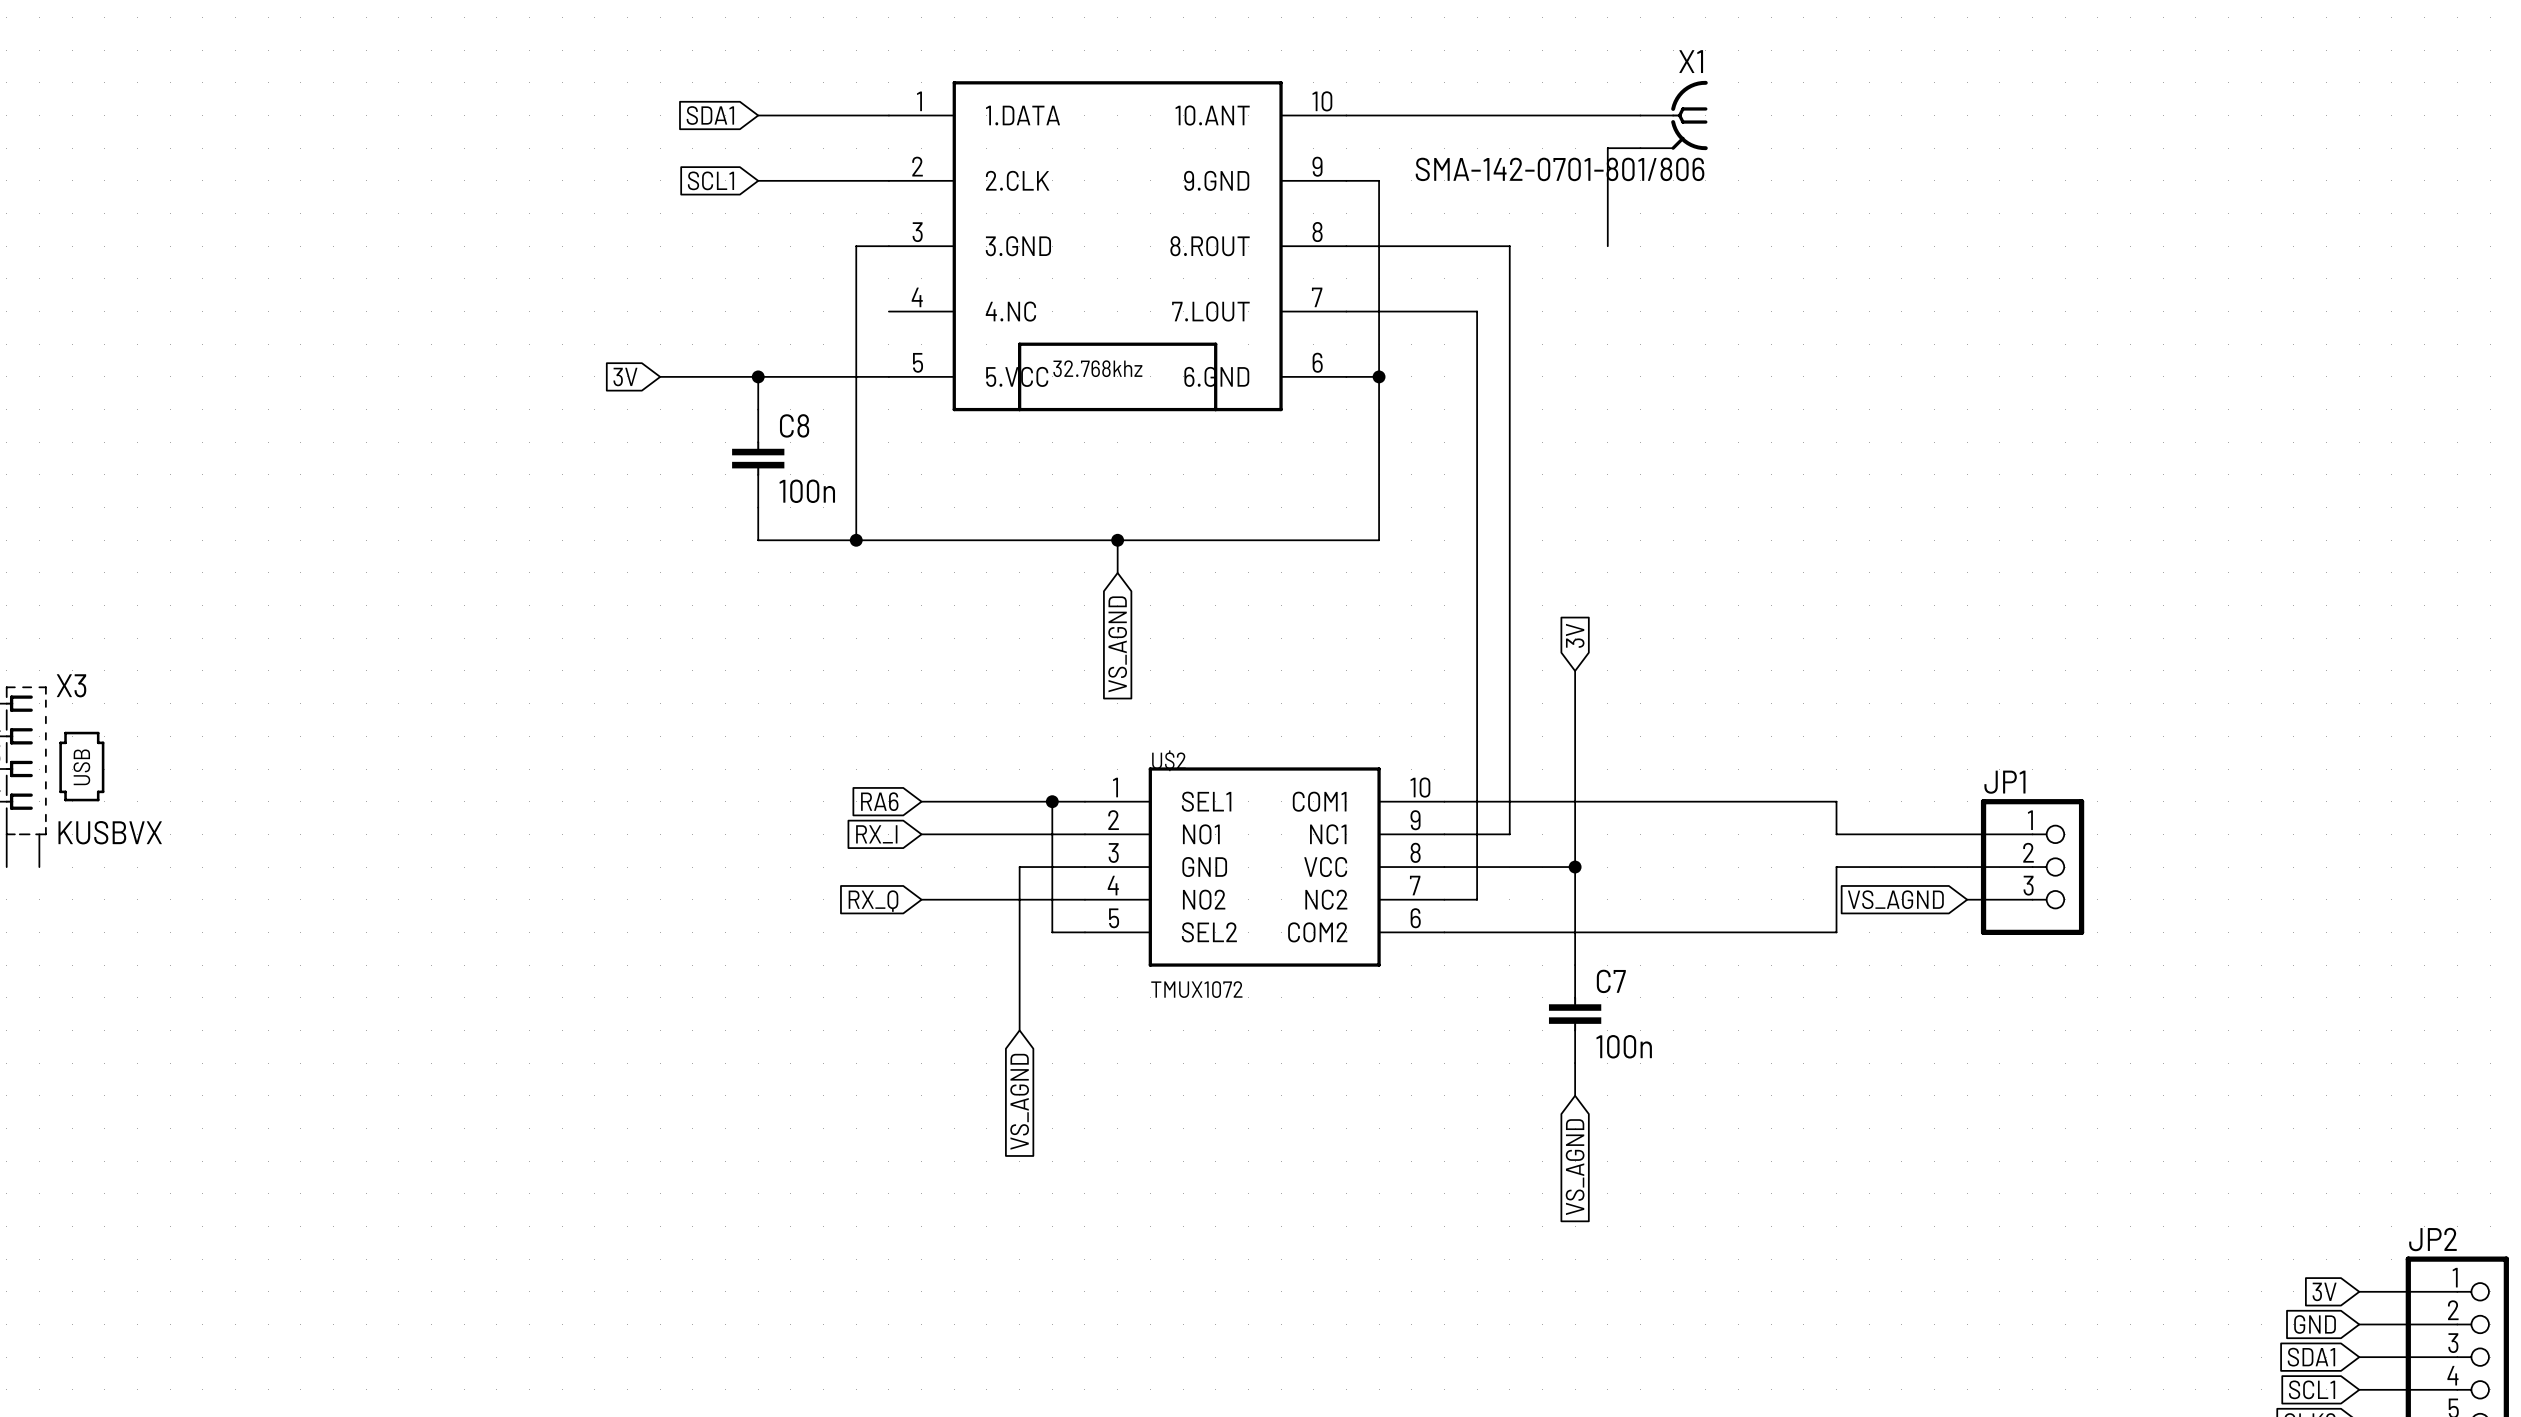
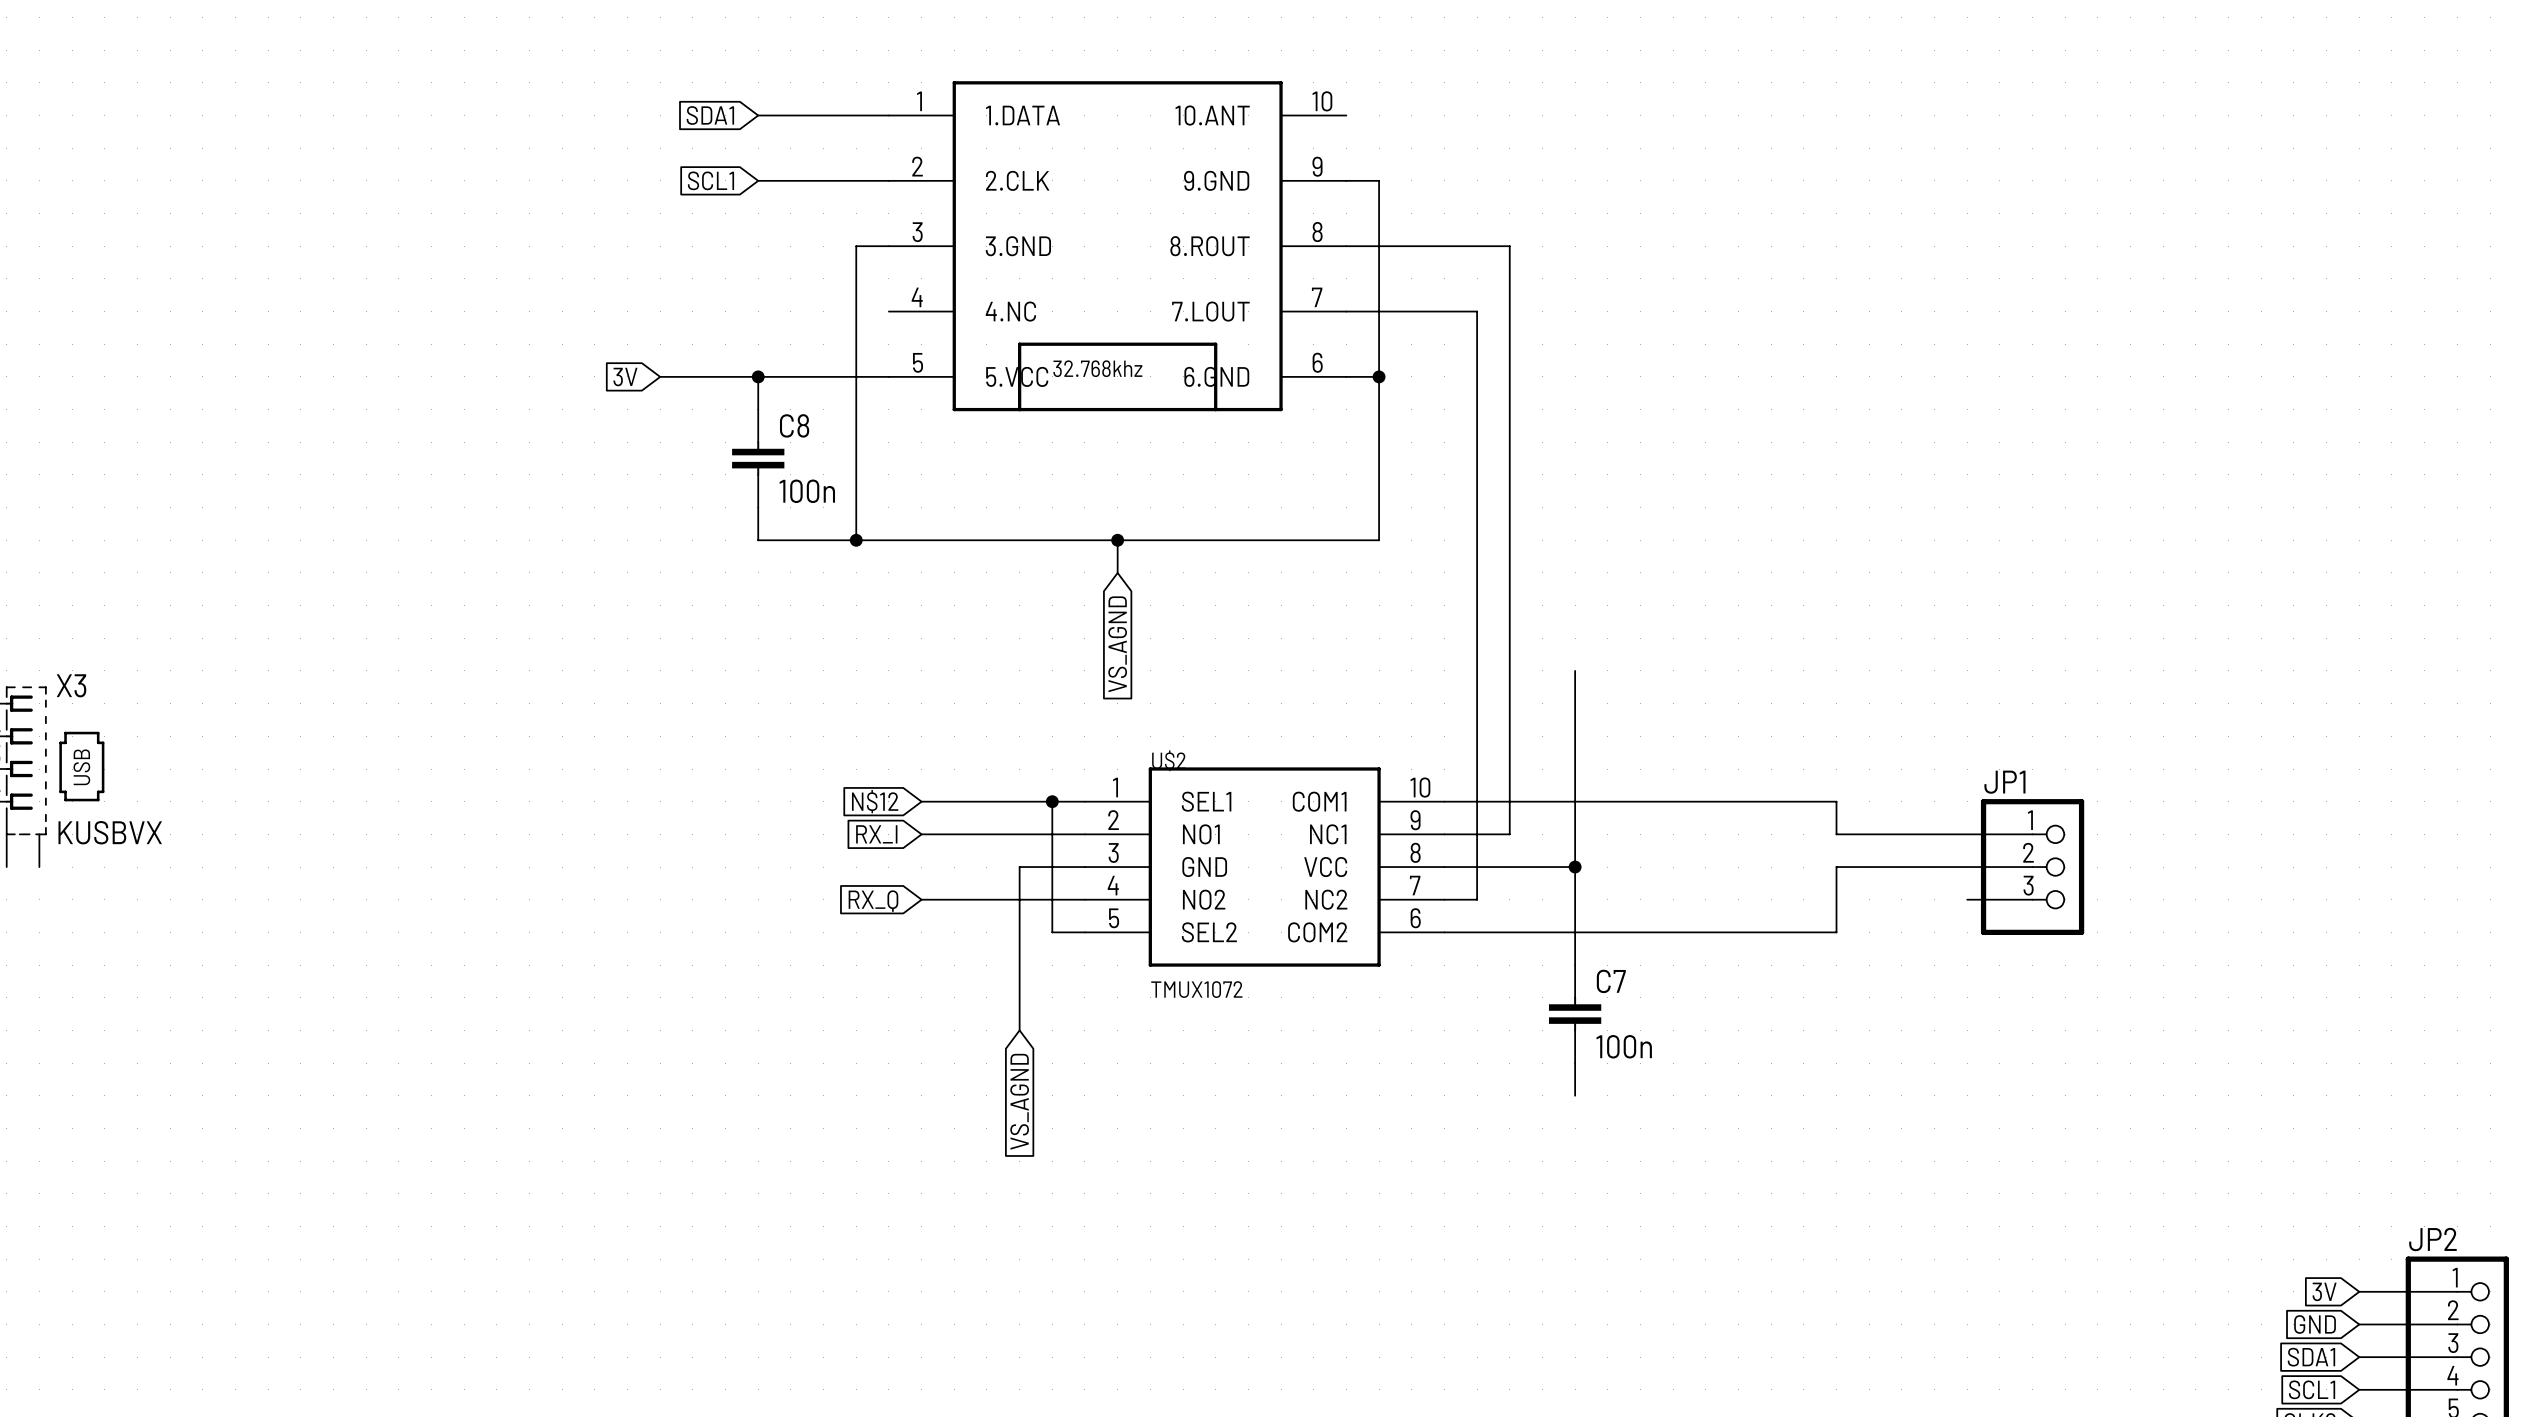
wire: (1346, 115) (1640, 115) -> none
X1: SMA-142-0701-801/806 (1674, 115) -> none
wire: (1640, 148) (1607, 148) (1607, 246) -> none
global label: 3V (1575, 635) -> none
global label: RA6 (879, 801) -> N$12 (875, 801)
global label: VS_AGND (1895, 899) -> none
global label: VS_AGND (1575, 1167) -> none

